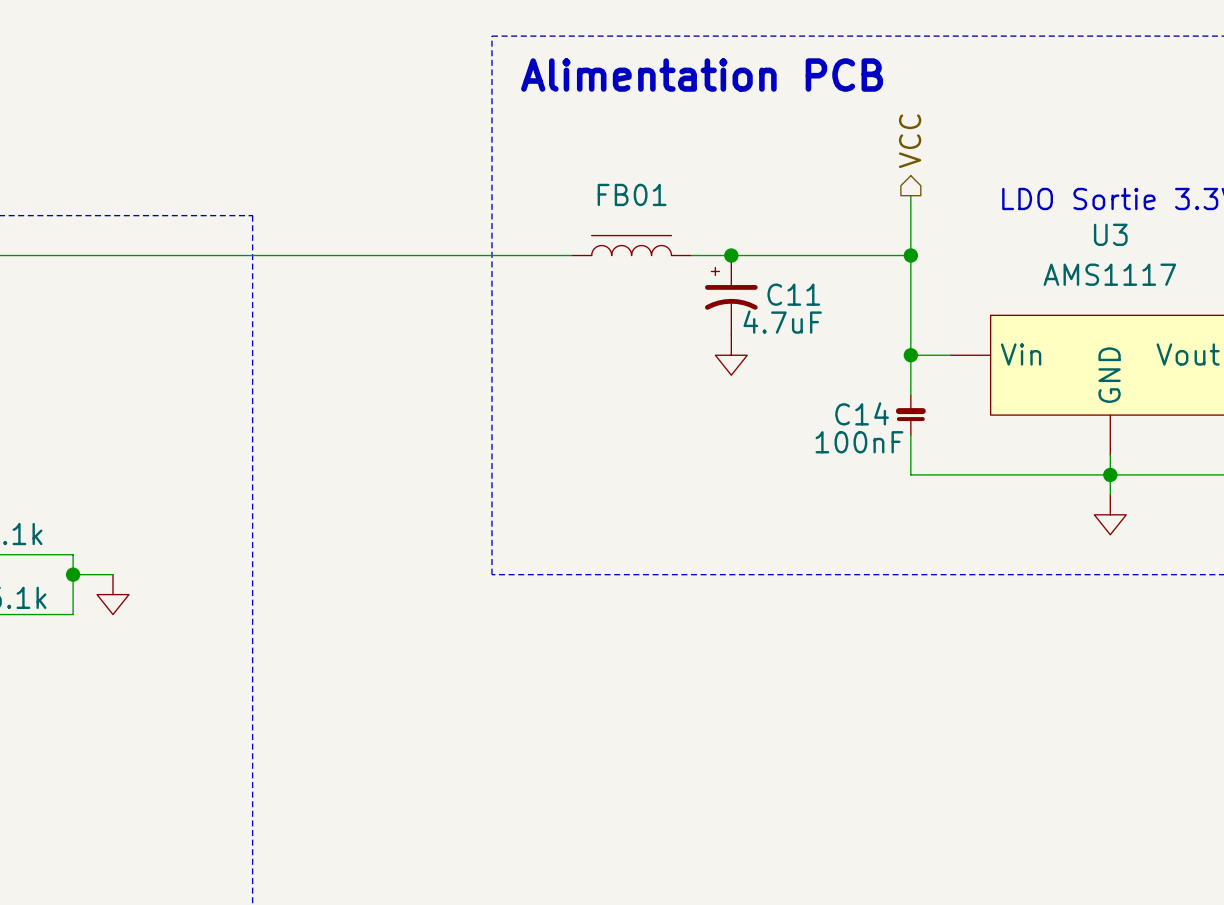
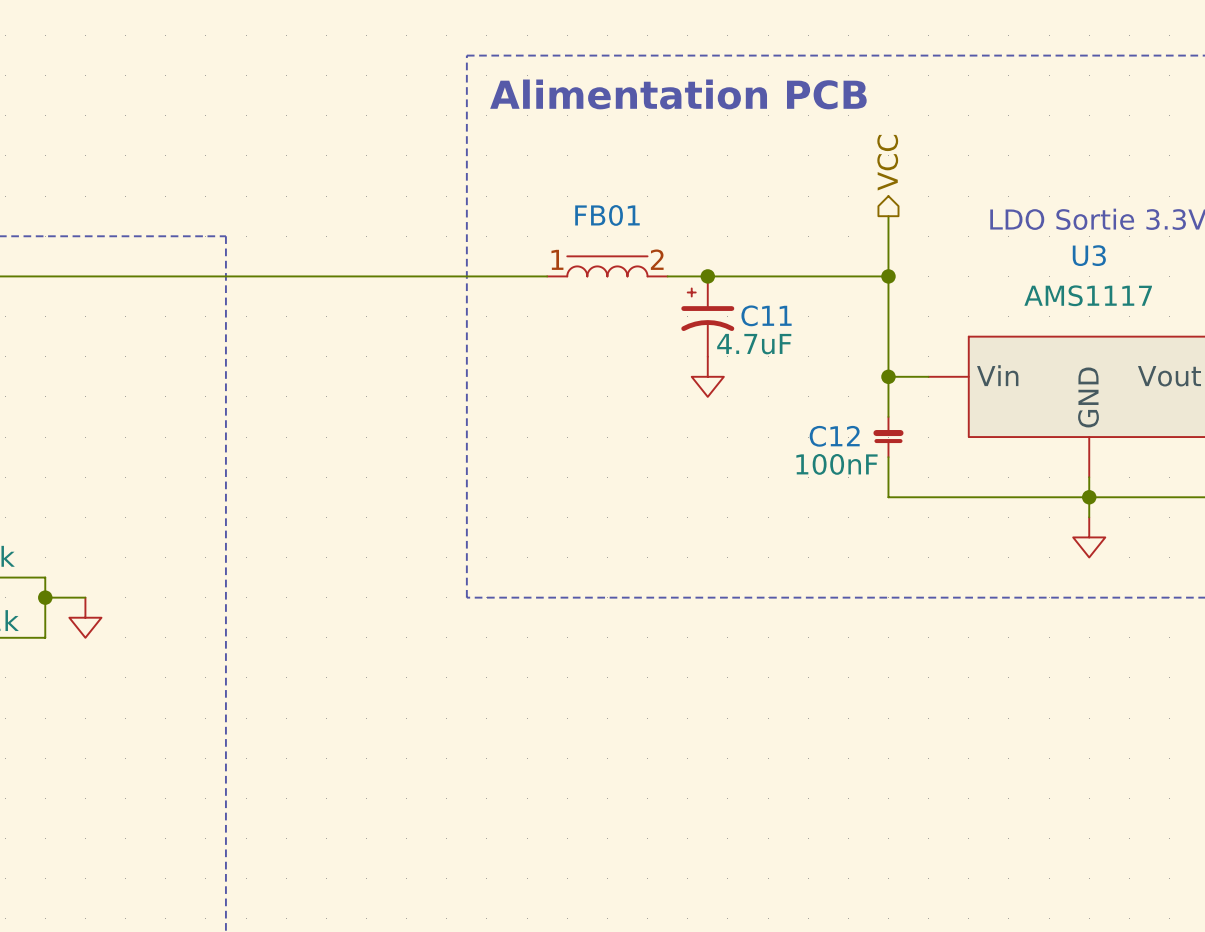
FB01 pin number: none -> 1 (557, 259)
FB01 pin number: none -> 2 (657, 259)
C14 name: C14 (862, 413) -> C12 (834, 436)

